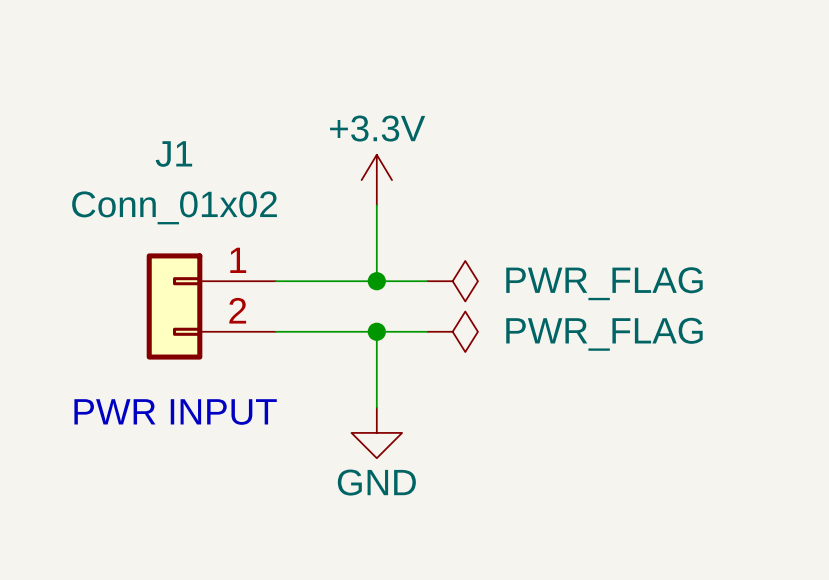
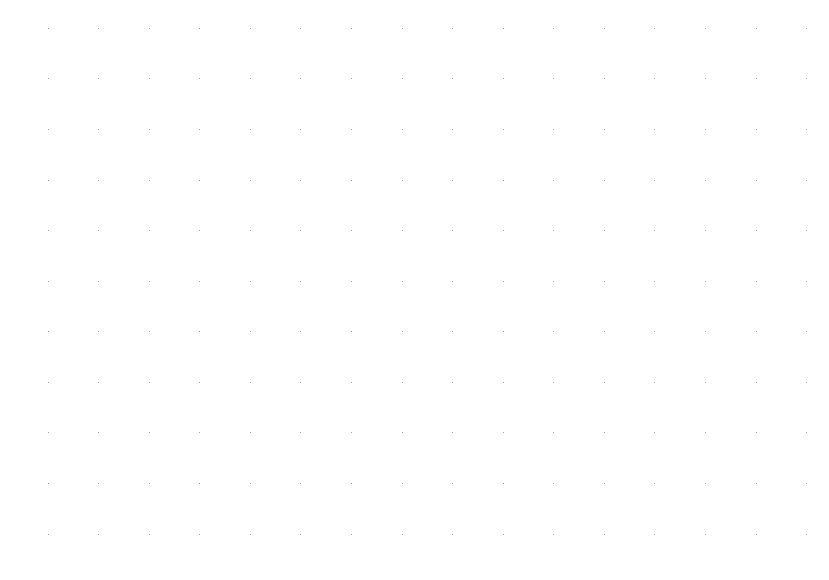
power symbol: +3.3V (376, 180) -> none
wire: (376, 205) (376, 281) -> none
wire: (275, 281) (427, 281) -> none
junction: (376, 281) -> none
power symbol: PWR_FLAG (452, 281) -> none
J1: Conn_01x02 (211, 306) -> none
wire: (275, 331) (427, 331) -> none
wire: (376, 331) (376, 407) -> none
junction: (376, 331) -> none
power symbol: PWR_FLAG (452, 331) -> none
text: PWR INPUT (175, 412) -> none
power symbol: GND (376, 432) -> none

